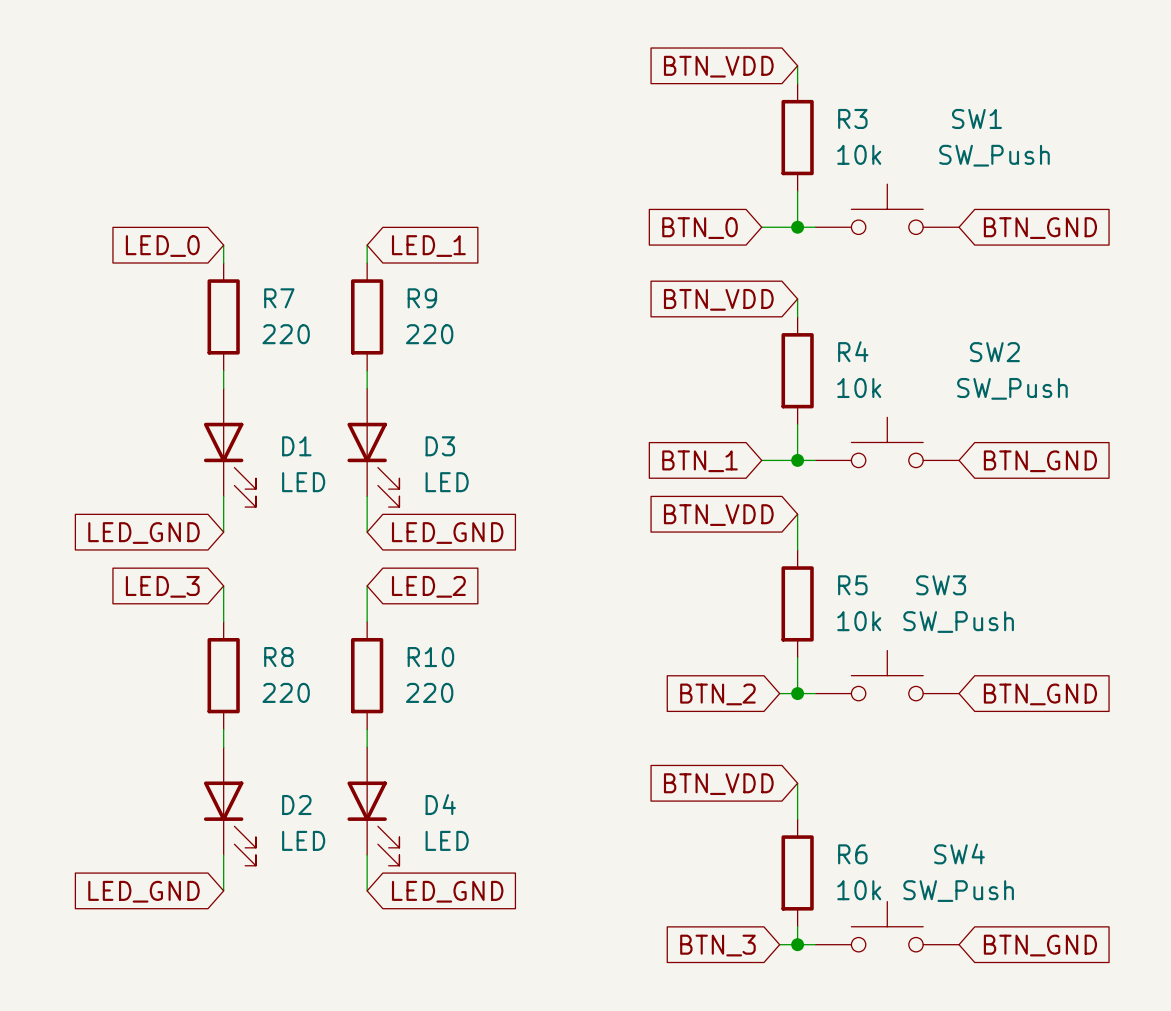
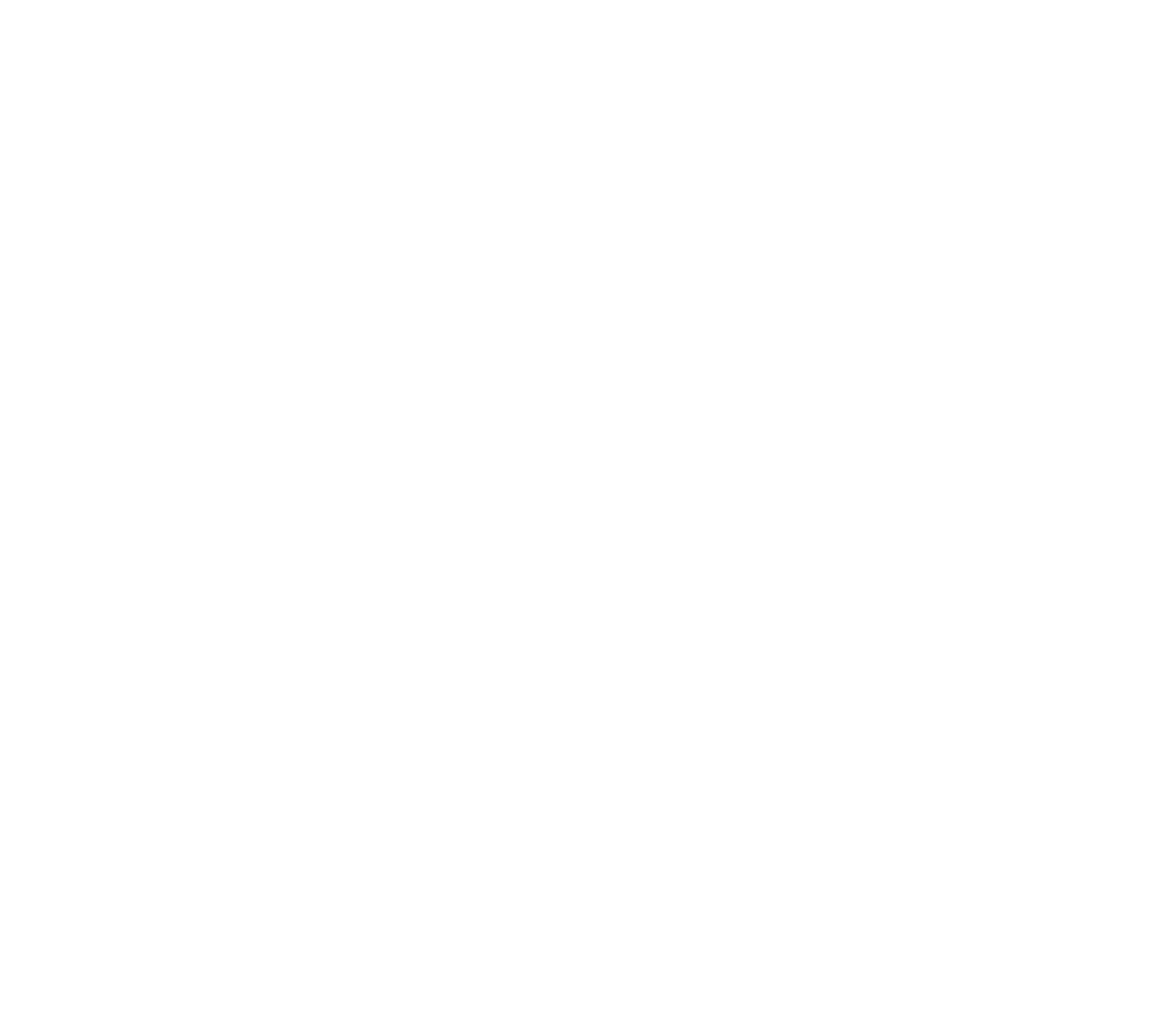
wire: (797, 65) (797, 83) -> none
global label: BTN_VDD (718, 66) -> none
R3: 10k (797, 137) -> none
wire: (797, 191) (797, 227) -> none
SW1: SW_Push (887, 209) -> none
wire: (761, 227) (815, 227) -> none
junction: (797, 227) -> none
global label: BTN_0 (700, 228) -> none
global label: BTN_GND (1040, 228) -> none
wire: (223, 245) (223, 263) -> none
wire: (367, 245) (367, 263) -> none
global label: LED_0 (162, 246) -> none
global label: LED_1 (428, 246) -> none
wire: (797, 298) (797, 316) -> none
global label: BTN_VDD (718, 299) -> none
R7: 220 (223, 316) -> none
R9: 220 (367, 316) -> none
wire: (223, 370) (223, 388) -> none
wire: (367, 370) (367, 388) -> none
R4: 10k (797, 370) -> none
wire: (797, 424) (797, 460) -> none
SW2: SW_Push (887, 442) -> none
D1: LED (229, 447) -> none
D3: LED (373, 447) -> none
wire: (761, 460) (815, 460) -> none
junction: (797, 460) -> none
global label: BTN_1 (700, 461) -> none
global label: BTN_GND (1040, 461) -> none
wire: (223, 496) (223, 532) -> none
wire: (367, 496) (367, 532) -> none
wire: (797, 514) (797, 550) -> none
global label: BTN_VDD (718, 515) -> none
global label: LED_GND (143, 533) -> none
global label: LED_GND (447, 533) -> none
wire: (223, 585) (223, 621) -> none
wire: (367, 585) (367, 621) -> none
global label: LED_3 (162, 586) -> none
global label: LED_2 (428, 586) -> none
R5: 10k (797, 603) -> none
wire: (797, 657) (797, 693) -> none
R8: 220 (223, 675) -> none
R10: 220 (367, 675) -> none
SW3: SW_Push (887, 675) -> none
wire: (779, 693) (815, 693) -> none
junction: (797, 693) -> none
global label: BTN_2 (717, 694) -> none
global label: BTN_GND (1040, 694) -> none
wire: (223, 729) (223, 747) -> none
wire: (367, 729) (367, 747) -> none
wire: (797, 783) (797, 819) -> none
global label: BTN_VDD (718, 784) -> none
D2: LED (229, 806) -> none
D4: LED (373, 806) -> none
wire: (223, 855) (223, 890) -> none
wire: (367, 855) (367, 890) -> none
R6: 10k (797, 872) -> none
global label: LED_GND (143, 891) -> none
global label: LED_GND (447, 891) -> none
wire: (797, 926) (797, 944) -> none
SW4: SW_Push (887, 926) -> none
wire: (779, 944) (815, 944) -> none
junction: (797, 944) -> none
global label: BTN_3 (717, 945) -> none
global label: BTN_GND (1040, 945) -> none

